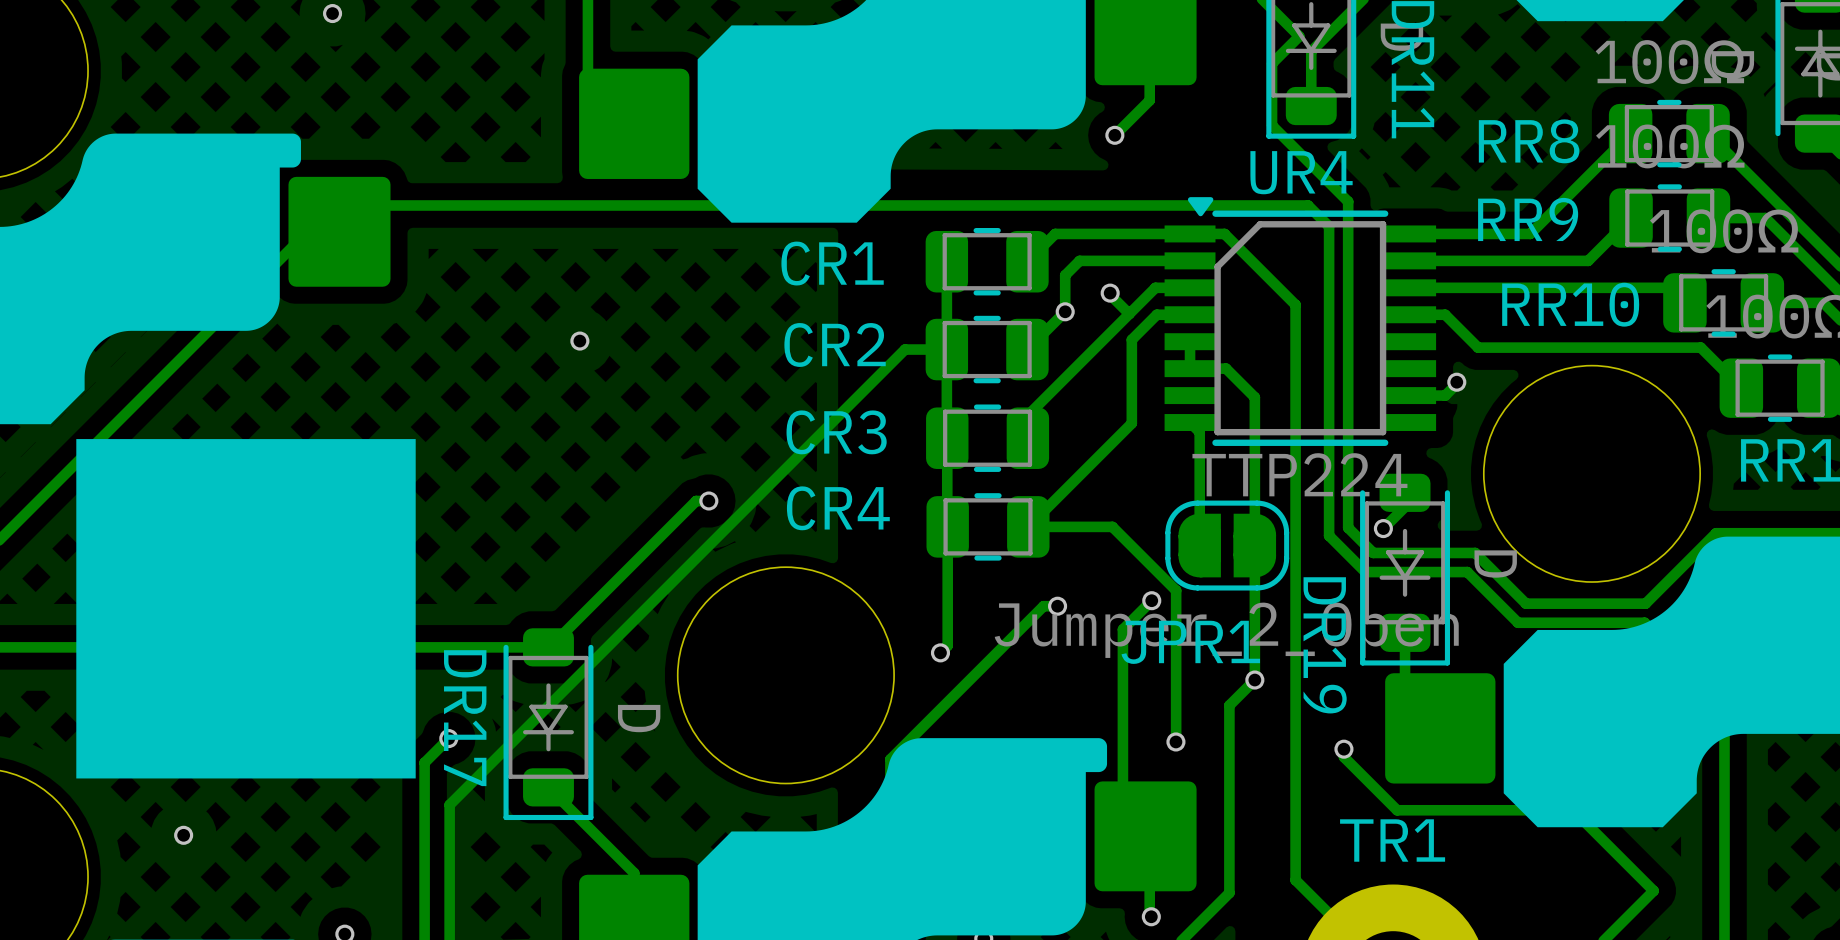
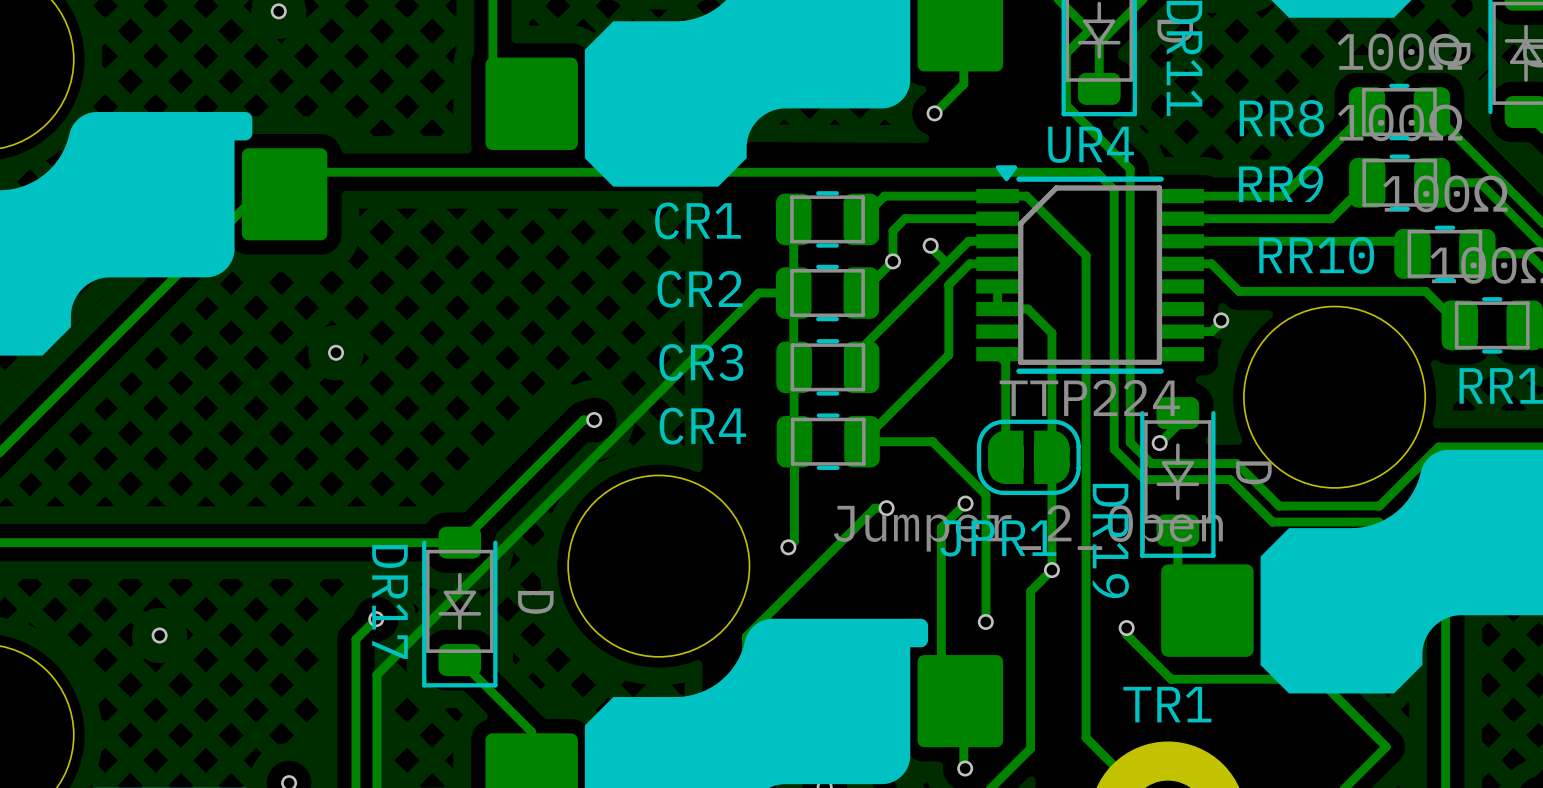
via position: (579, 341) -> (336, 352)
drawing: [76, 439, 416, 779] -> none
via position: (183, 835) -> (159, 635)

